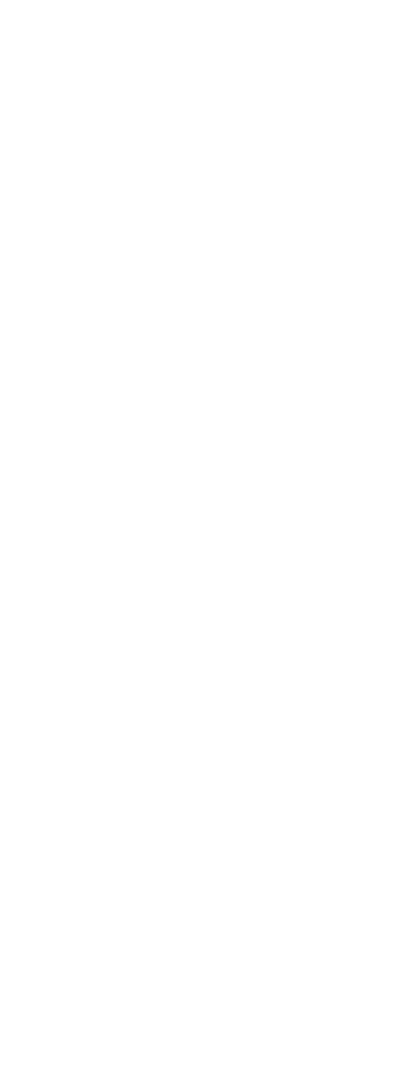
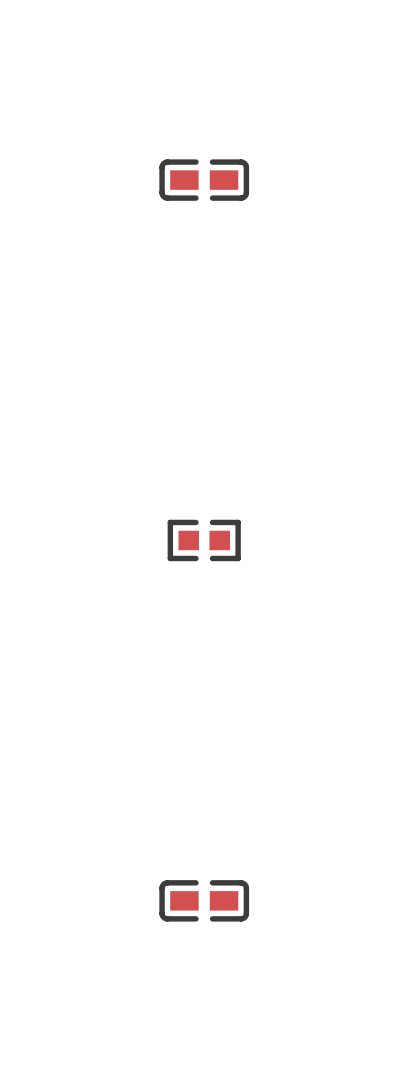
part: none -> (204, 180)
part: none -> (204, 540)
part: none -> (204, 900)

